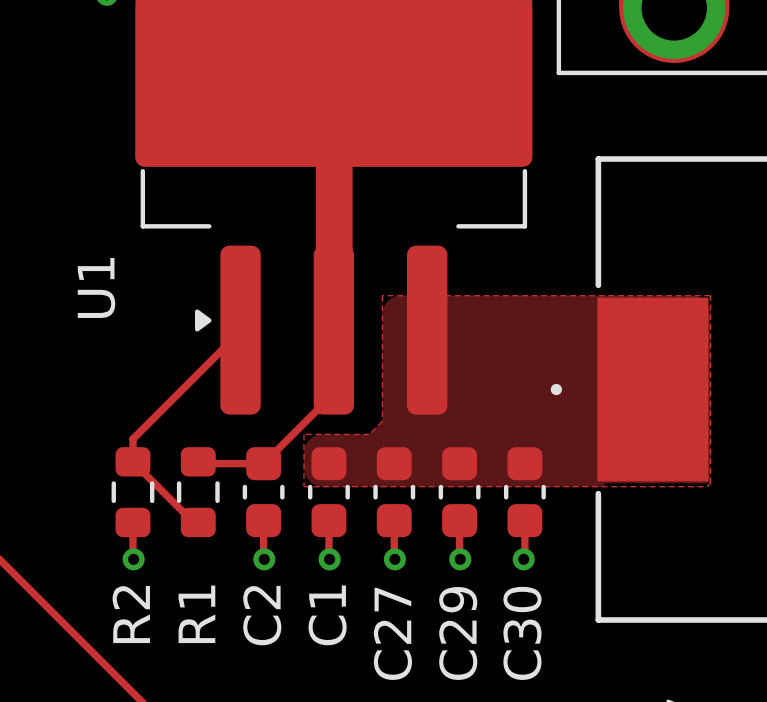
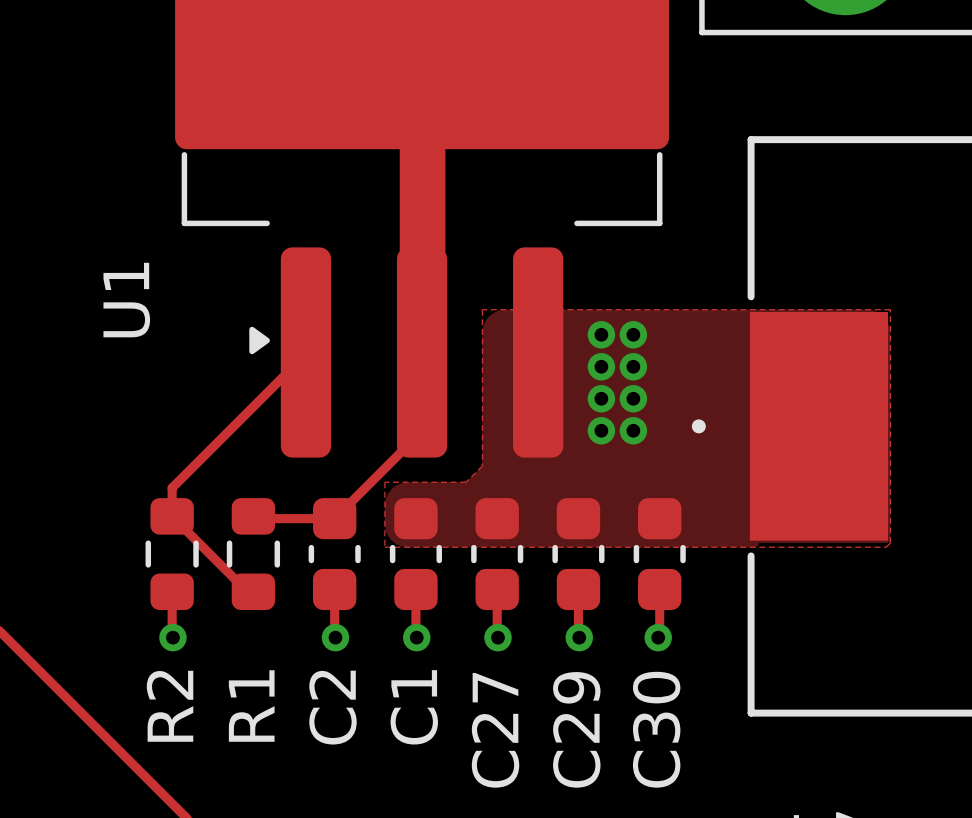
via: none -> (601, 334)
via: none -> (633, 334)
via: none -> (601, 366)
via: none -> (633, 366)
via: none -> (601, 398)
via: none -> (633, 398)
via: none -> (601, 430)
via: none -> (633, 430)

